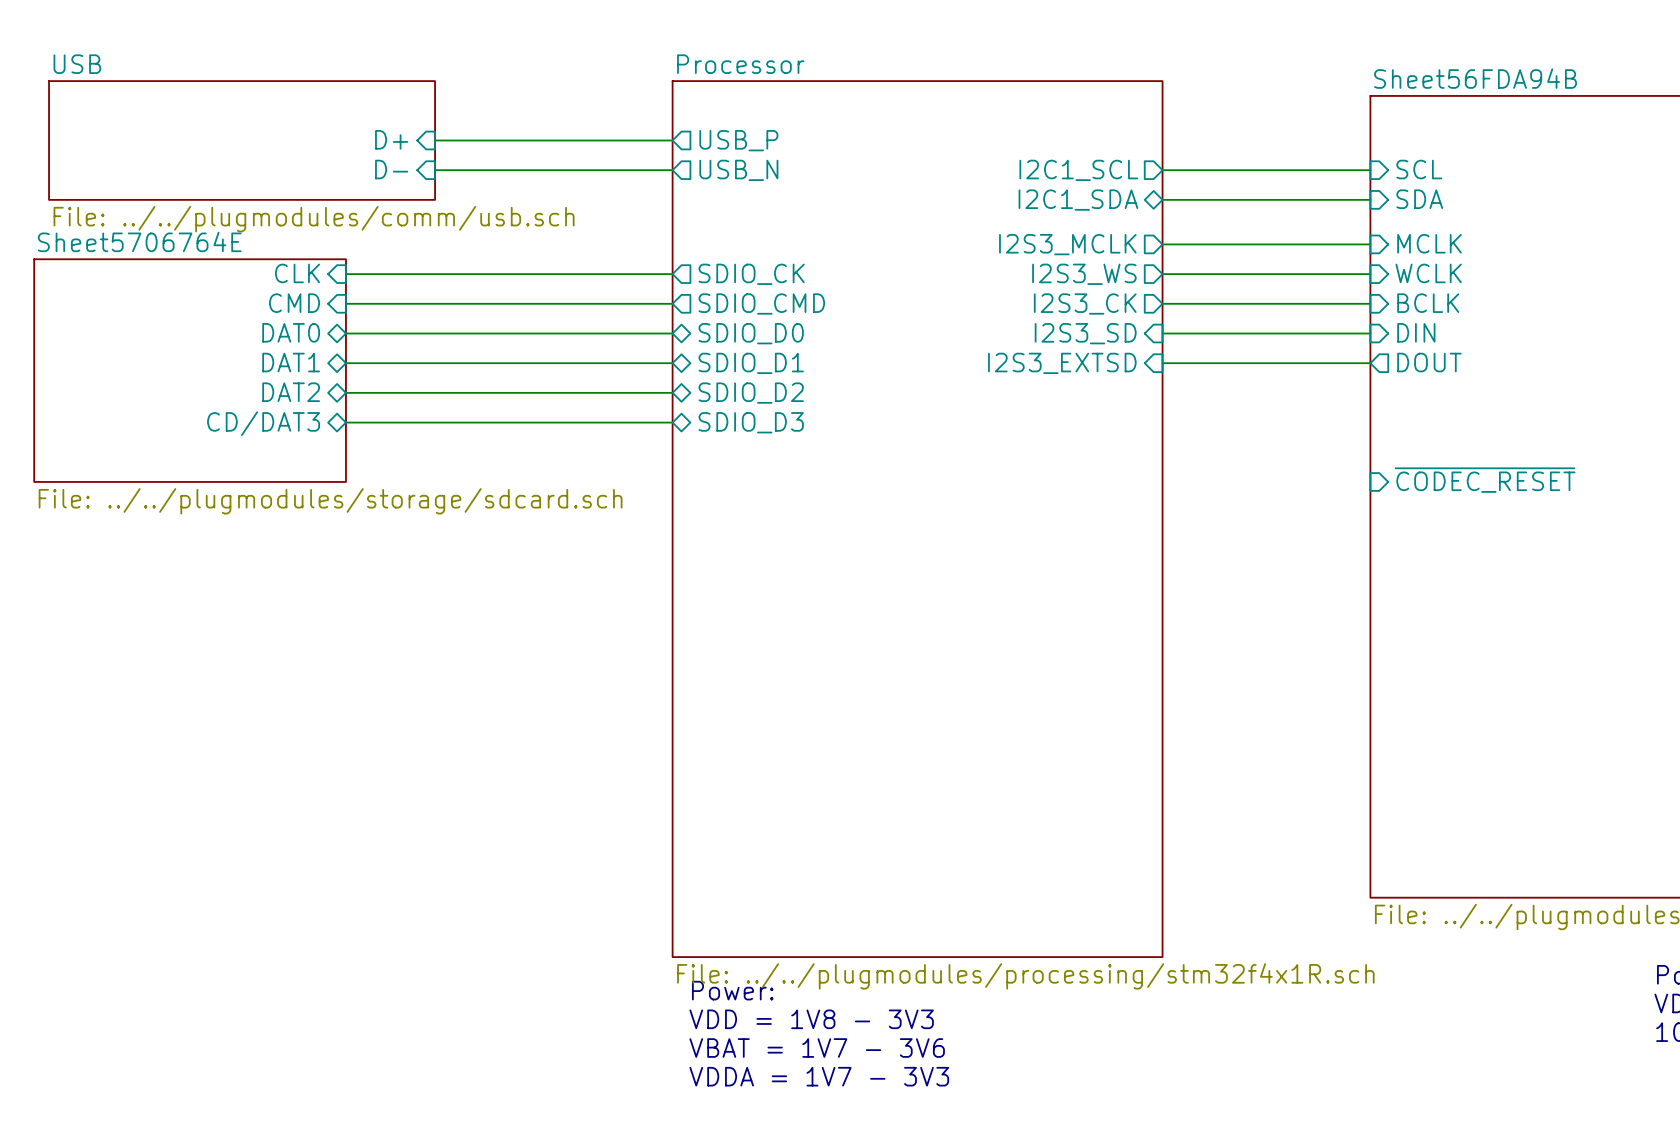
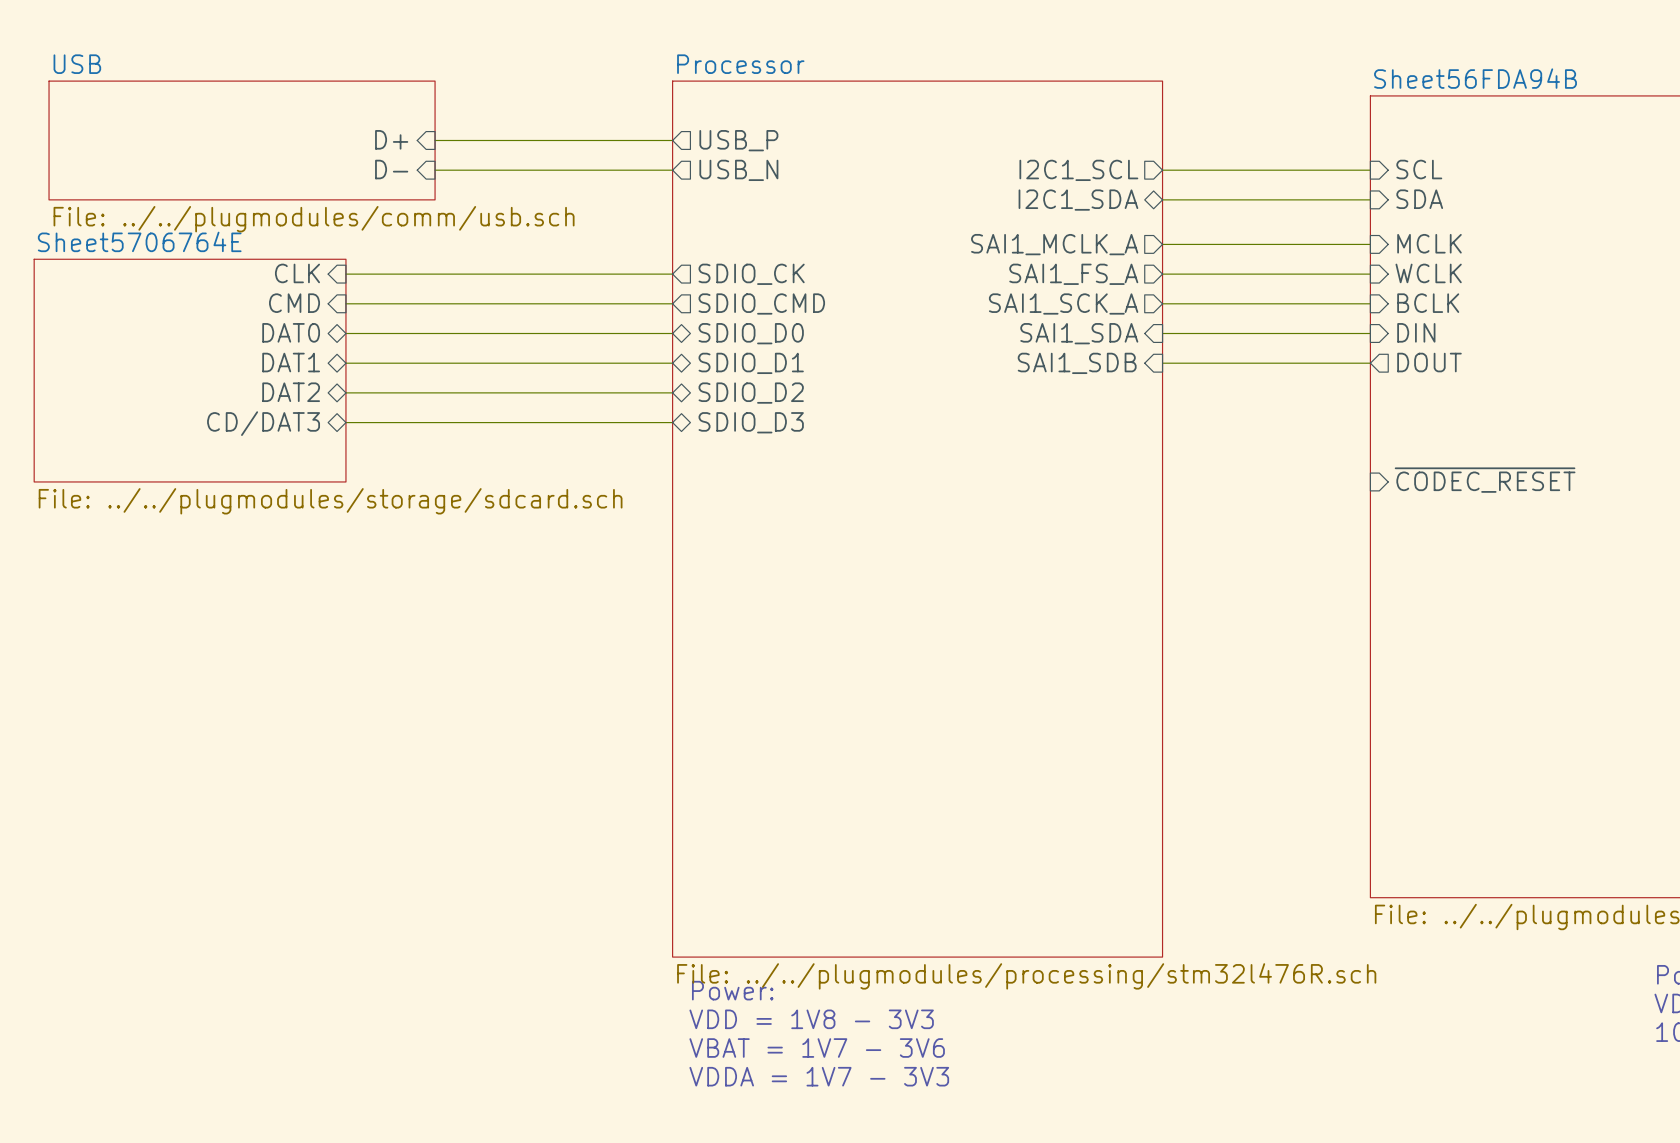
sheet pin: I2S3_MCLK (1067, 244) -> SAI1_MCLK_A (1054, 244)
sheet pin: I2S3_WS (1084, 274) -> SAI1_FS_A (1073, 274)
sheet pin: I2S3_CK (1085, 303) -> SAI1_SCK_A (1063, 303)
sheet pin: I2S3_SD (1085, 333) -> SAI1_SDA (1079, 333)
sheet pin: I2S3_EXTSD (1062, 363) -> SAI1_SDB (1077, 363)
sheet Processor value: File: ../../plugmodules/processing/stm32f4x1R.sch (1025, 976) -> File: ../../plugmodules/processing/stm32l476R.sch (1026, 976)

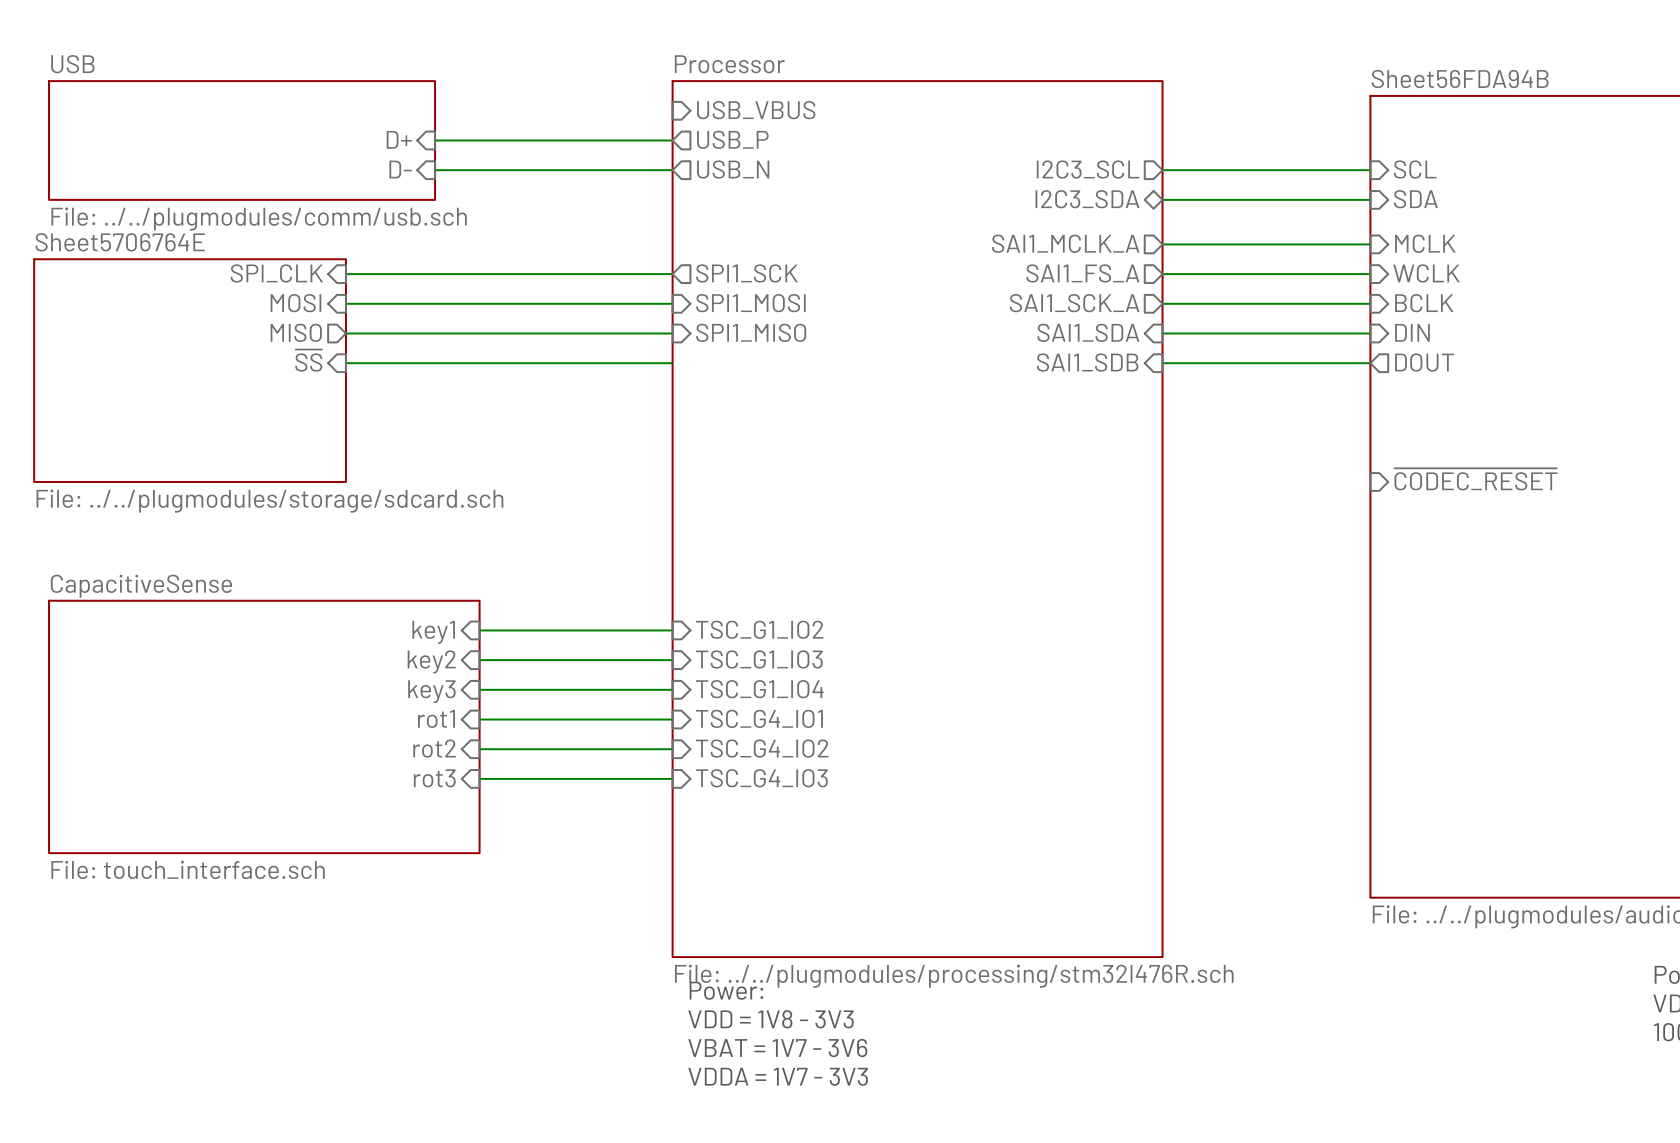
sheet pin: none -> USB_VBUS (756, 110)
sheet pin: I2C1_SCL (1078, 170) -> I2C3_SCL (1088, 169)
sheet pin: I2C1_SDA (1078, 200) -> I2C3_SDA (1087, 199)
sheet pin: CLK (297, 273) -> SPI_CLK (276, 273)
sheet pin: SDIO_CK (751, 274) -> SPI1_SCK (746, 273)
sheet pin: CMD (294, 303) -> MOSI (295, 303)
sheet pin shape: output (761, 303) -> input (750, 303)
sheet pin: SDIO_CMD (761, 303) -> SPI1_MOSI (750, 303)
sheet pin shape: bidirectional (291, 332) -> output (296, 332)
sheet pin: DAT0 (291, 332) -> MISO (296, 332)
sheet pin shape: bidirectional (751, 333) -> input (751, 332)
sheet pin: SDIO_D0 (751, 333) -> SPI1_MISO (751, 332)
sheet pin shape: bidirectional (291, 362) -> input (308, 360)
sheet pin: DAT1 (291, 362) -> ~{SS} (308, 360)
sheet pin: SDIO_D1 (751, 363) -> none
sheet pin: DAT2 (291, 392) -> none
wire: (345, 392) (672, 392) -> none
sheet pin: SDIO_D2 (751, 393) -> none
wire: (345, 422) (672, 422) -> none
sheet pin: SDIO_D3 (751, 422) -> none
sheet pin: CD/DAT3 (263, 423) -> none
wire: none -> (479, 630) (672, 630)
sheet pin: none -> TSC_G1_IO2 (759, 629)
sheet pin: none -> key1 (433, 632)
wire: none -> (479, 660) (672, 660)
sheet pin: none -> TSC_G1_IO3 (759, 659)
sheet pin: none -> key2 (431, 661)
wire: none -> (479, 689) (672, 689)
sheet pin: none -> TSC_G1_IO4 (759, 689)
sheet pin: none -> key3 (431, 691)
sheet pin: none -> rot1 (436, 718)
wire: none -> (479, 719) (672, 719)
sheet pin: none -> TSC_G4_IO1 (759, 718)
sheet CapacitiveSense: none -> File: touch_interface.sch (264, 726)
sheet pin: none -> rot2 (434, 748)
sheet pin: none -> TSC_G4_IO2 (762, 748)
wire: none -> (479, 749) (672, 749)
sheet pin: none -> rot3 (434, 778)
wire: none -> (479, 778) (672, 778)
sheet pin: none -> TSC_G4_IO3 (761, 778)

